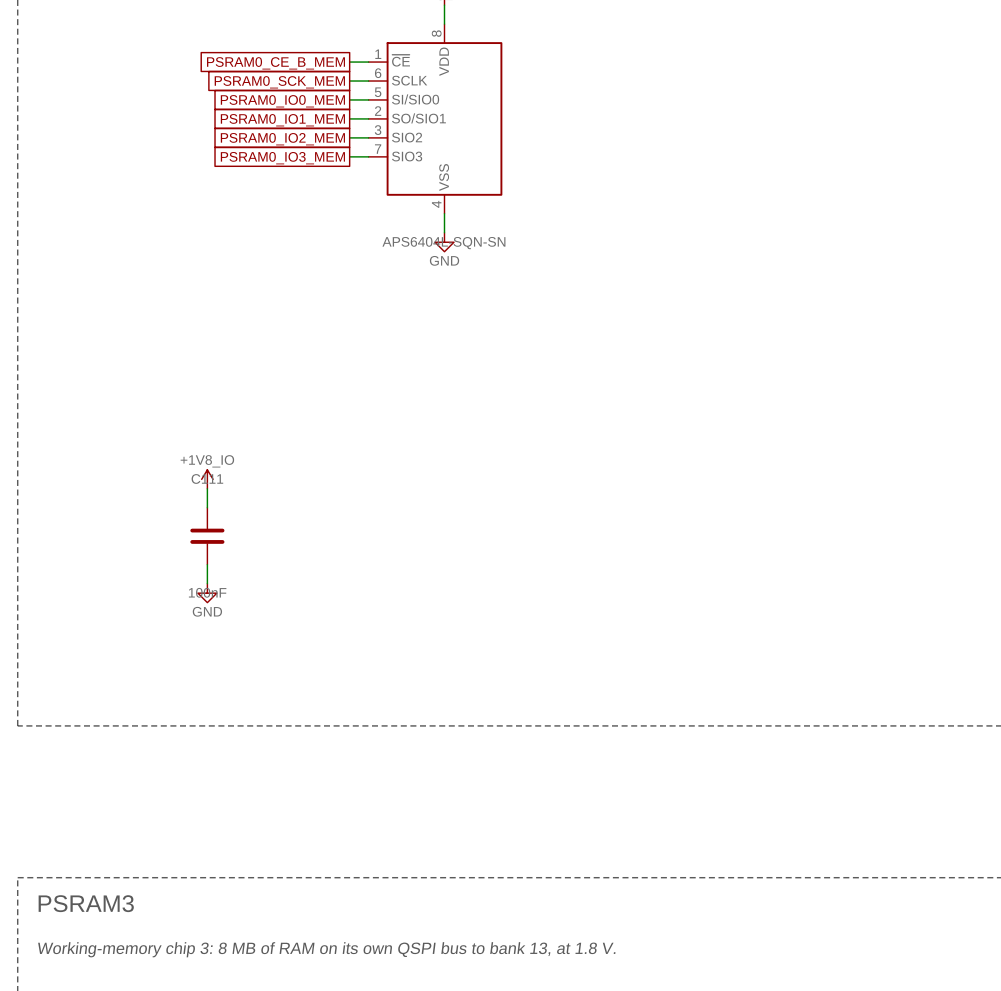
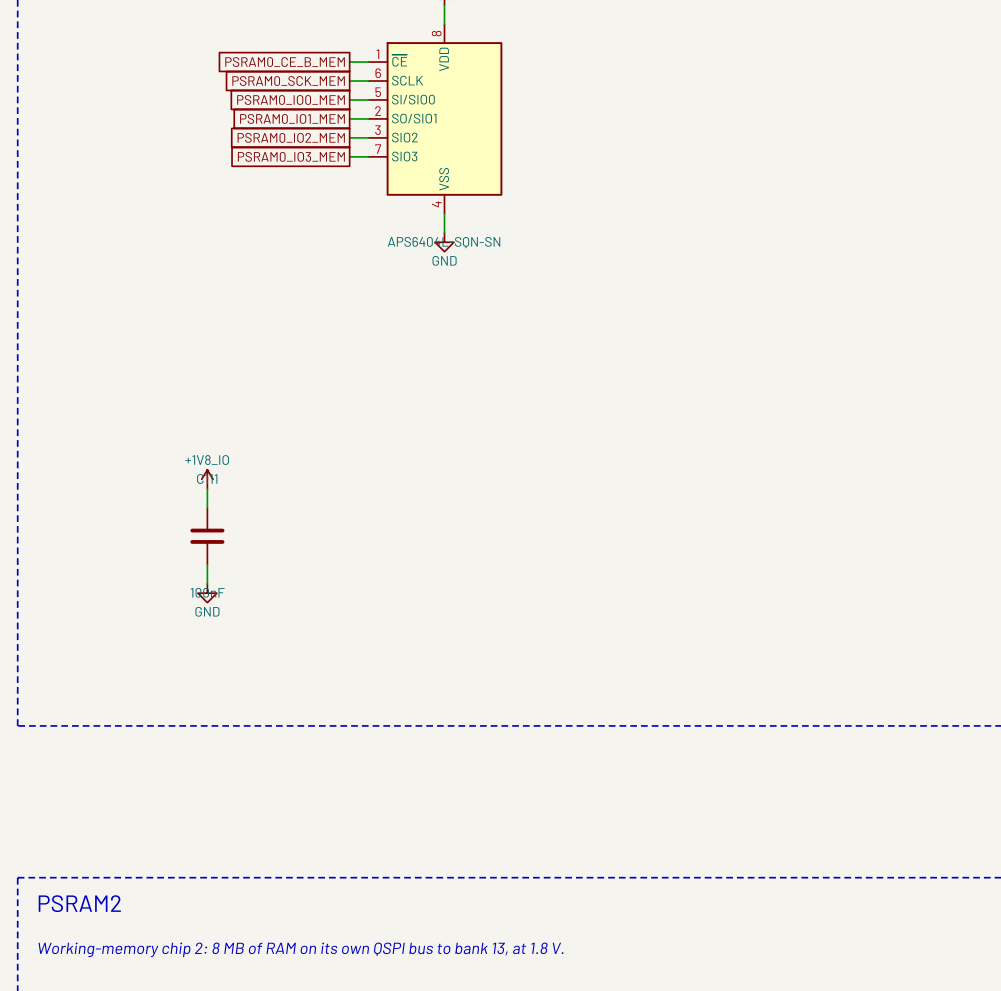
text: PSRAM3 (86, 903) -> PSRAM2 (79, 903)
text: Working-memory chip 3: 8 MB of RAM on its own QSPI bus to bank 13, at 1.8 V. (326, 949) -> Working-memory chip 2: 8 MB of RAM on its own QSPI bus to bank 13, at 1.8 V. (300, 949)

